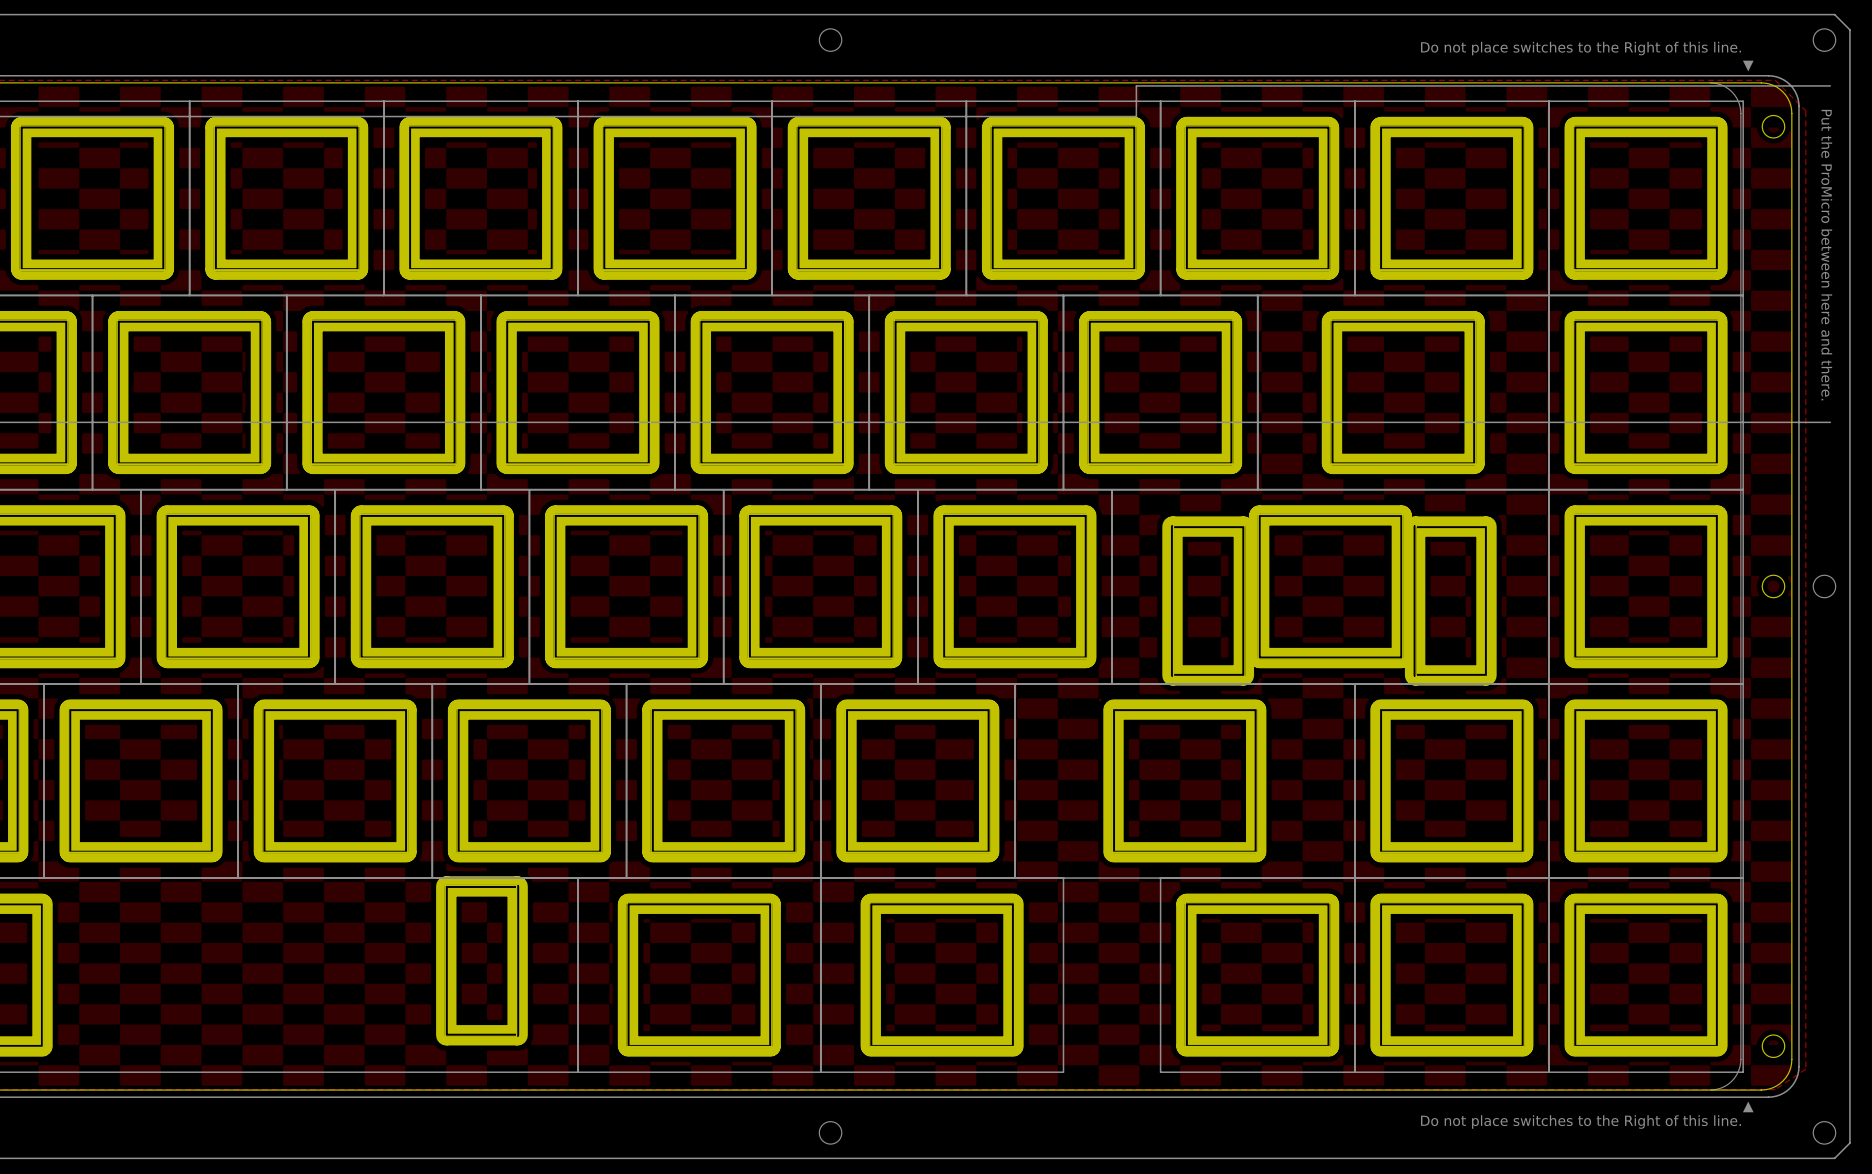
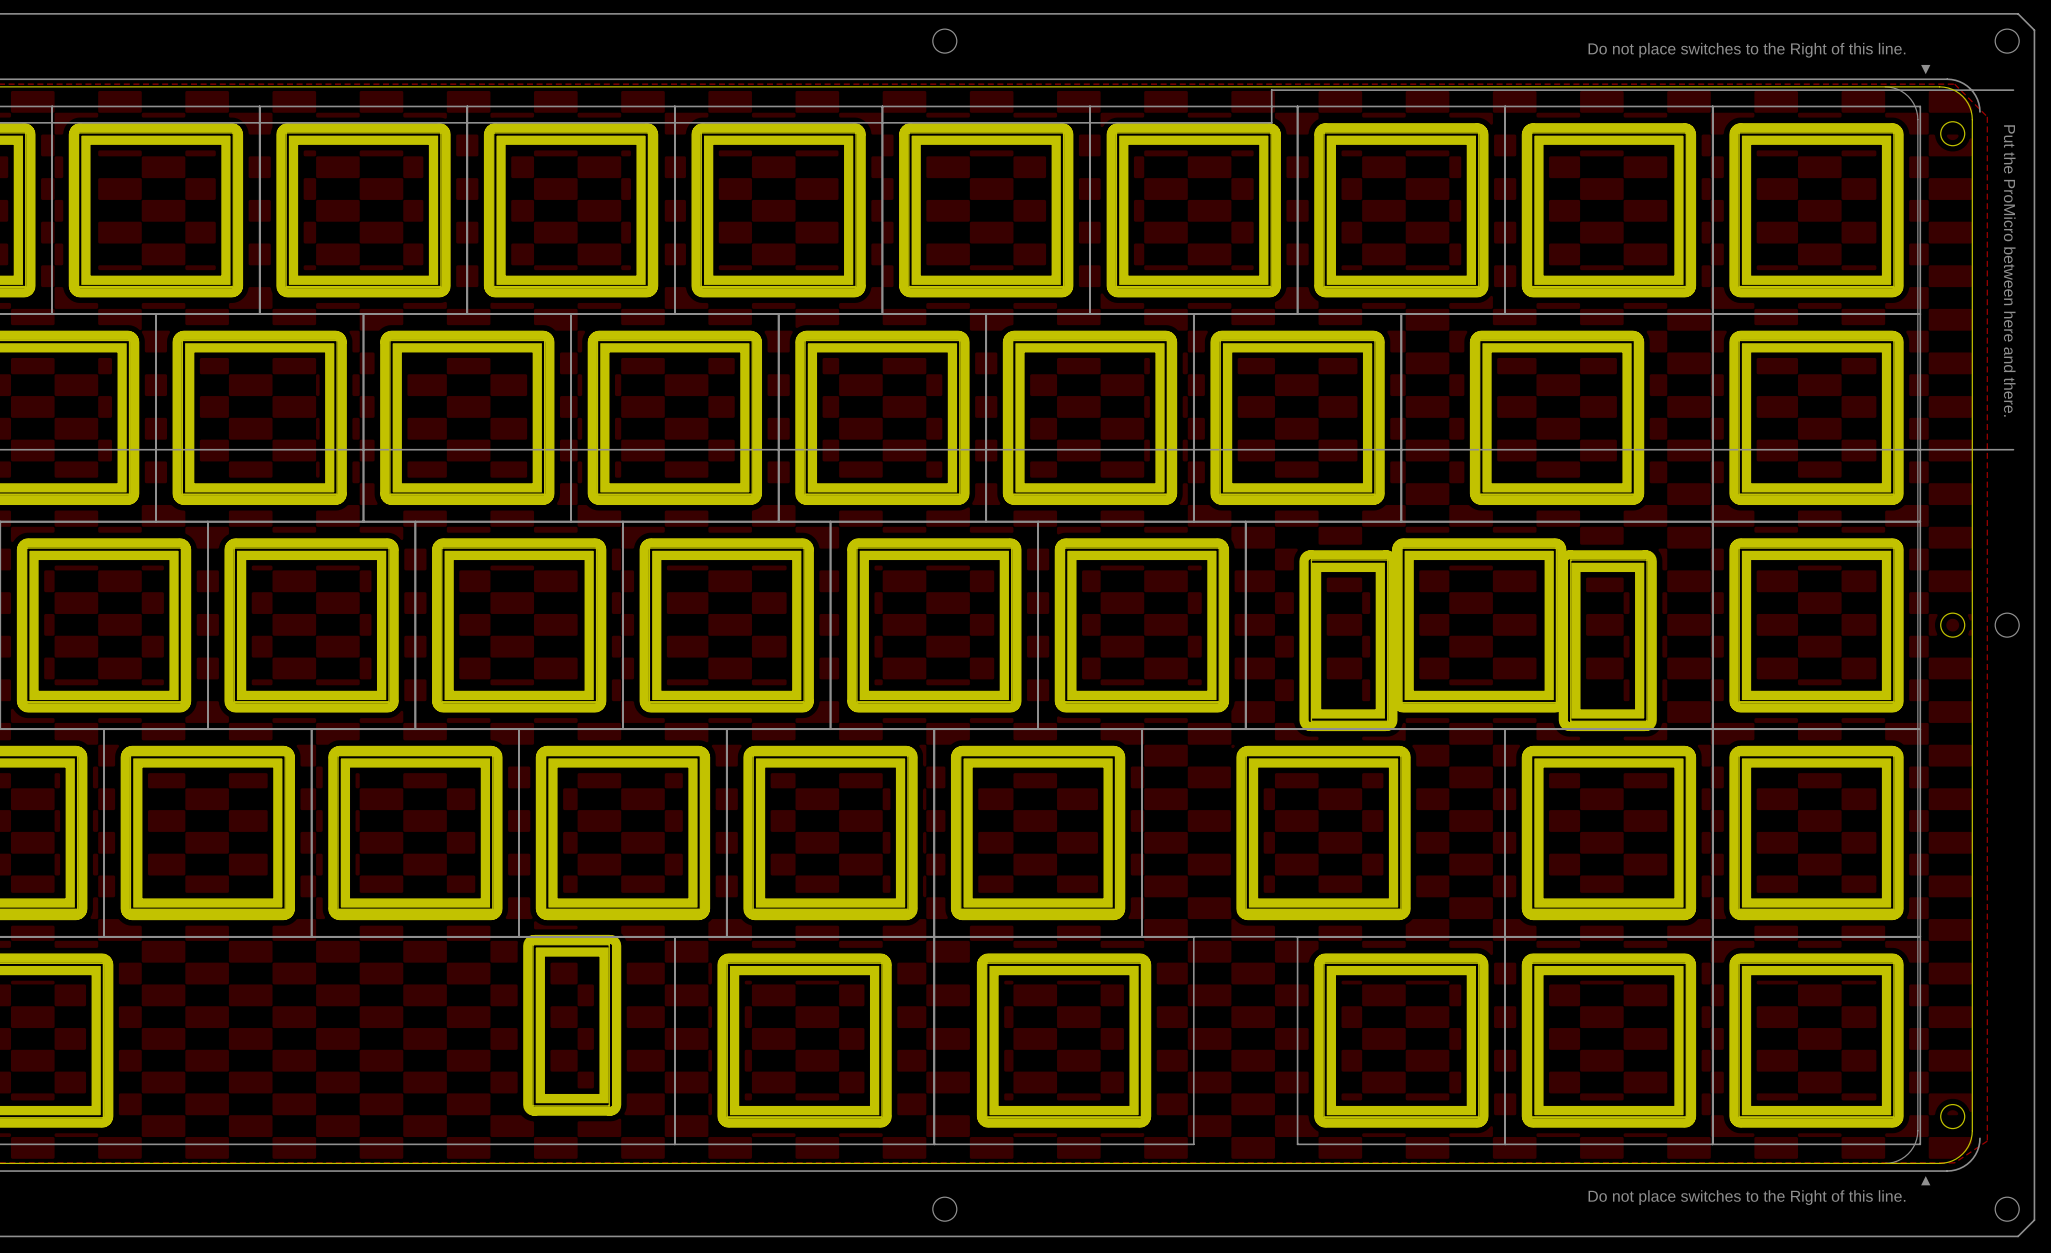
line: (1798, 106) (1798, 1066) -> none

